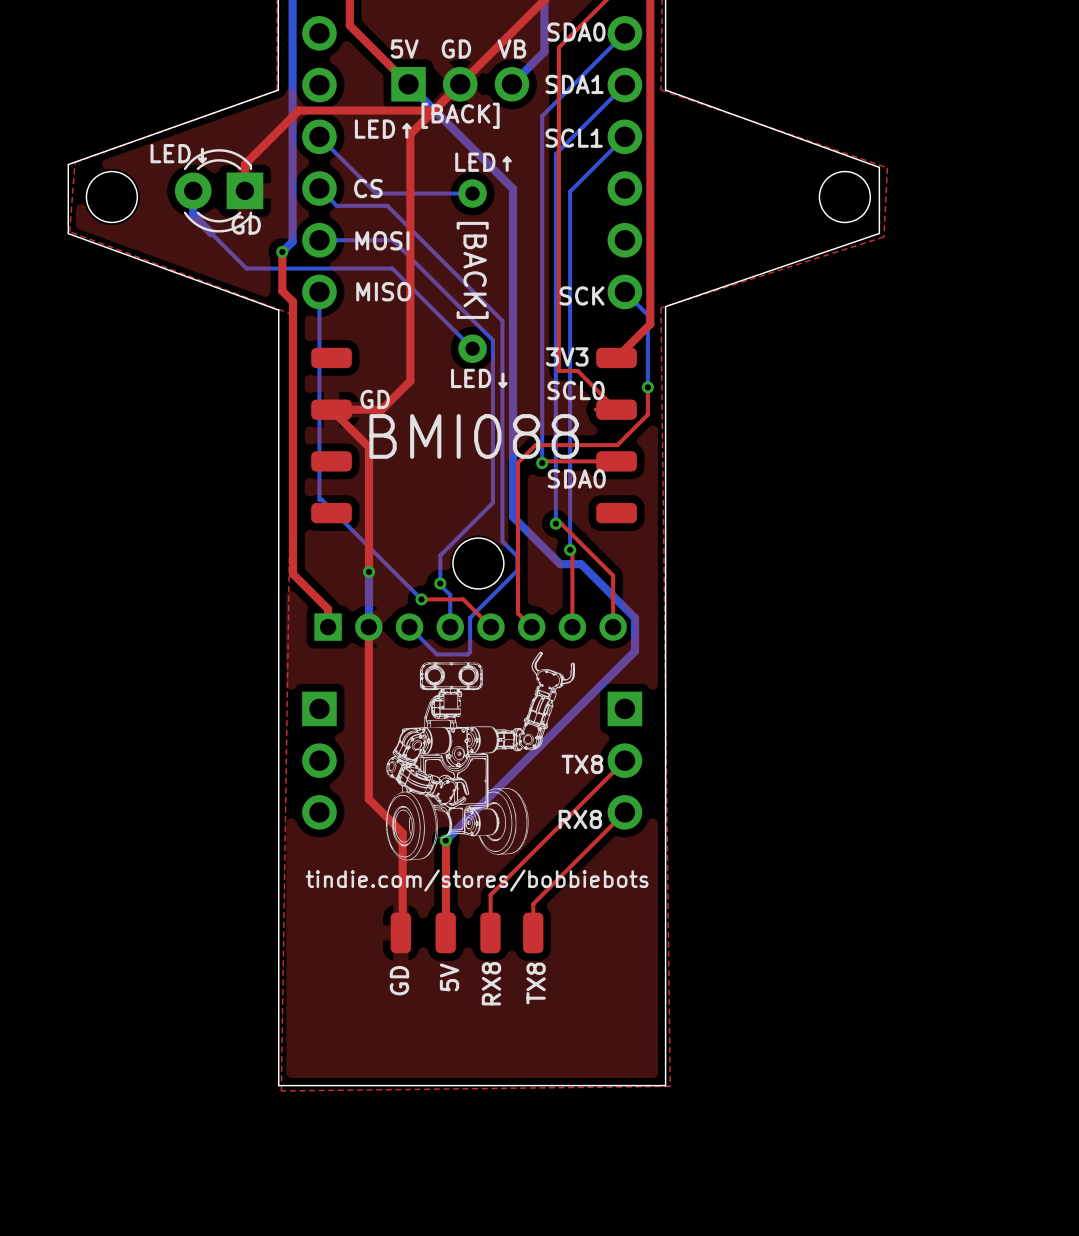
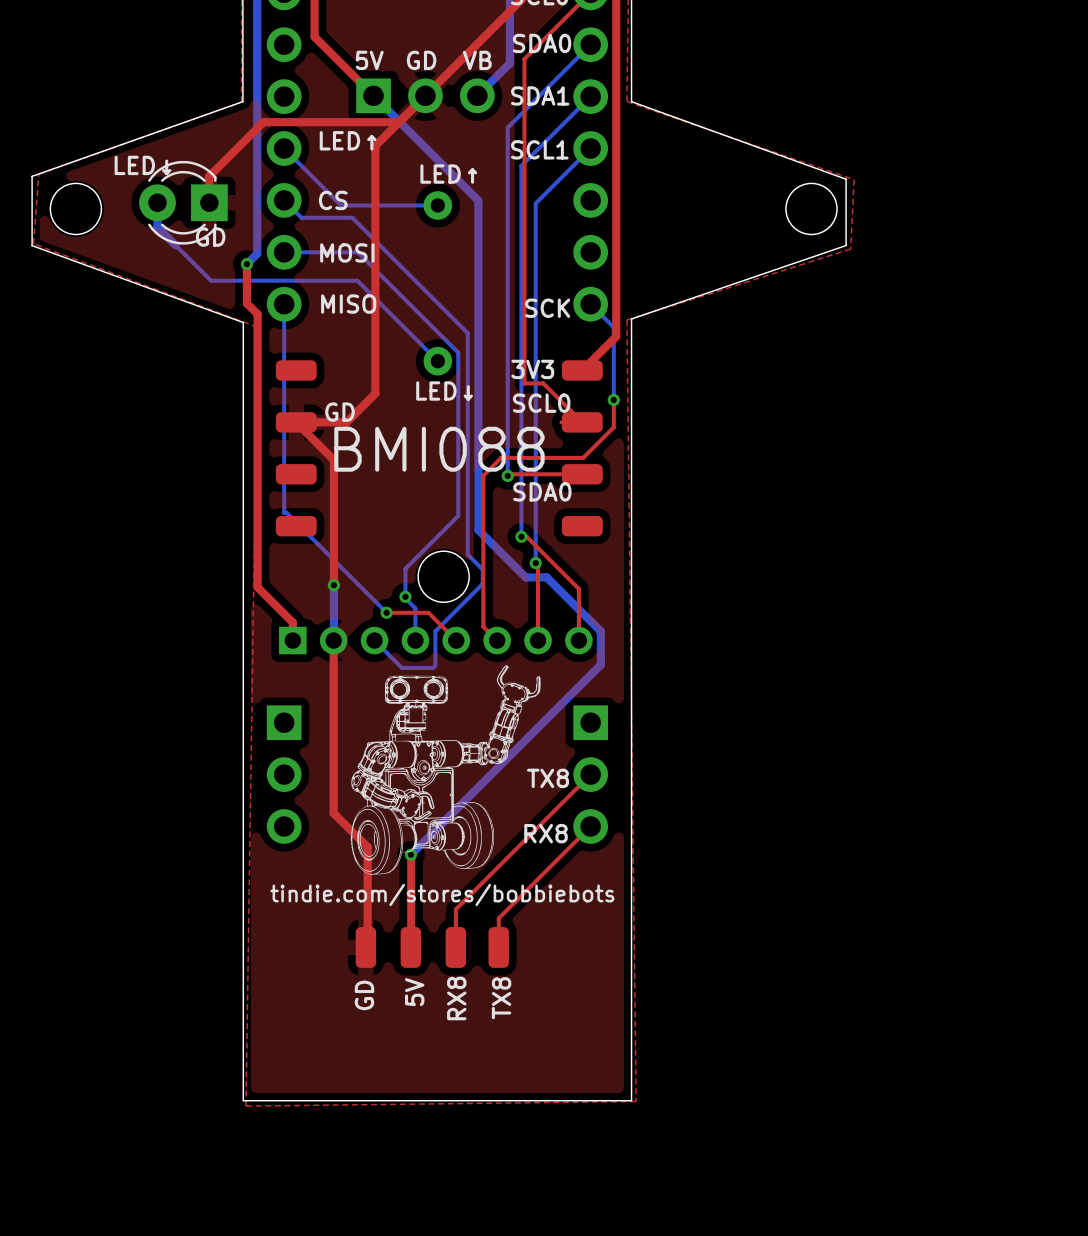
text: [BACK] (460, 115) -> none
text: [BACK] (472, 270) -> none

